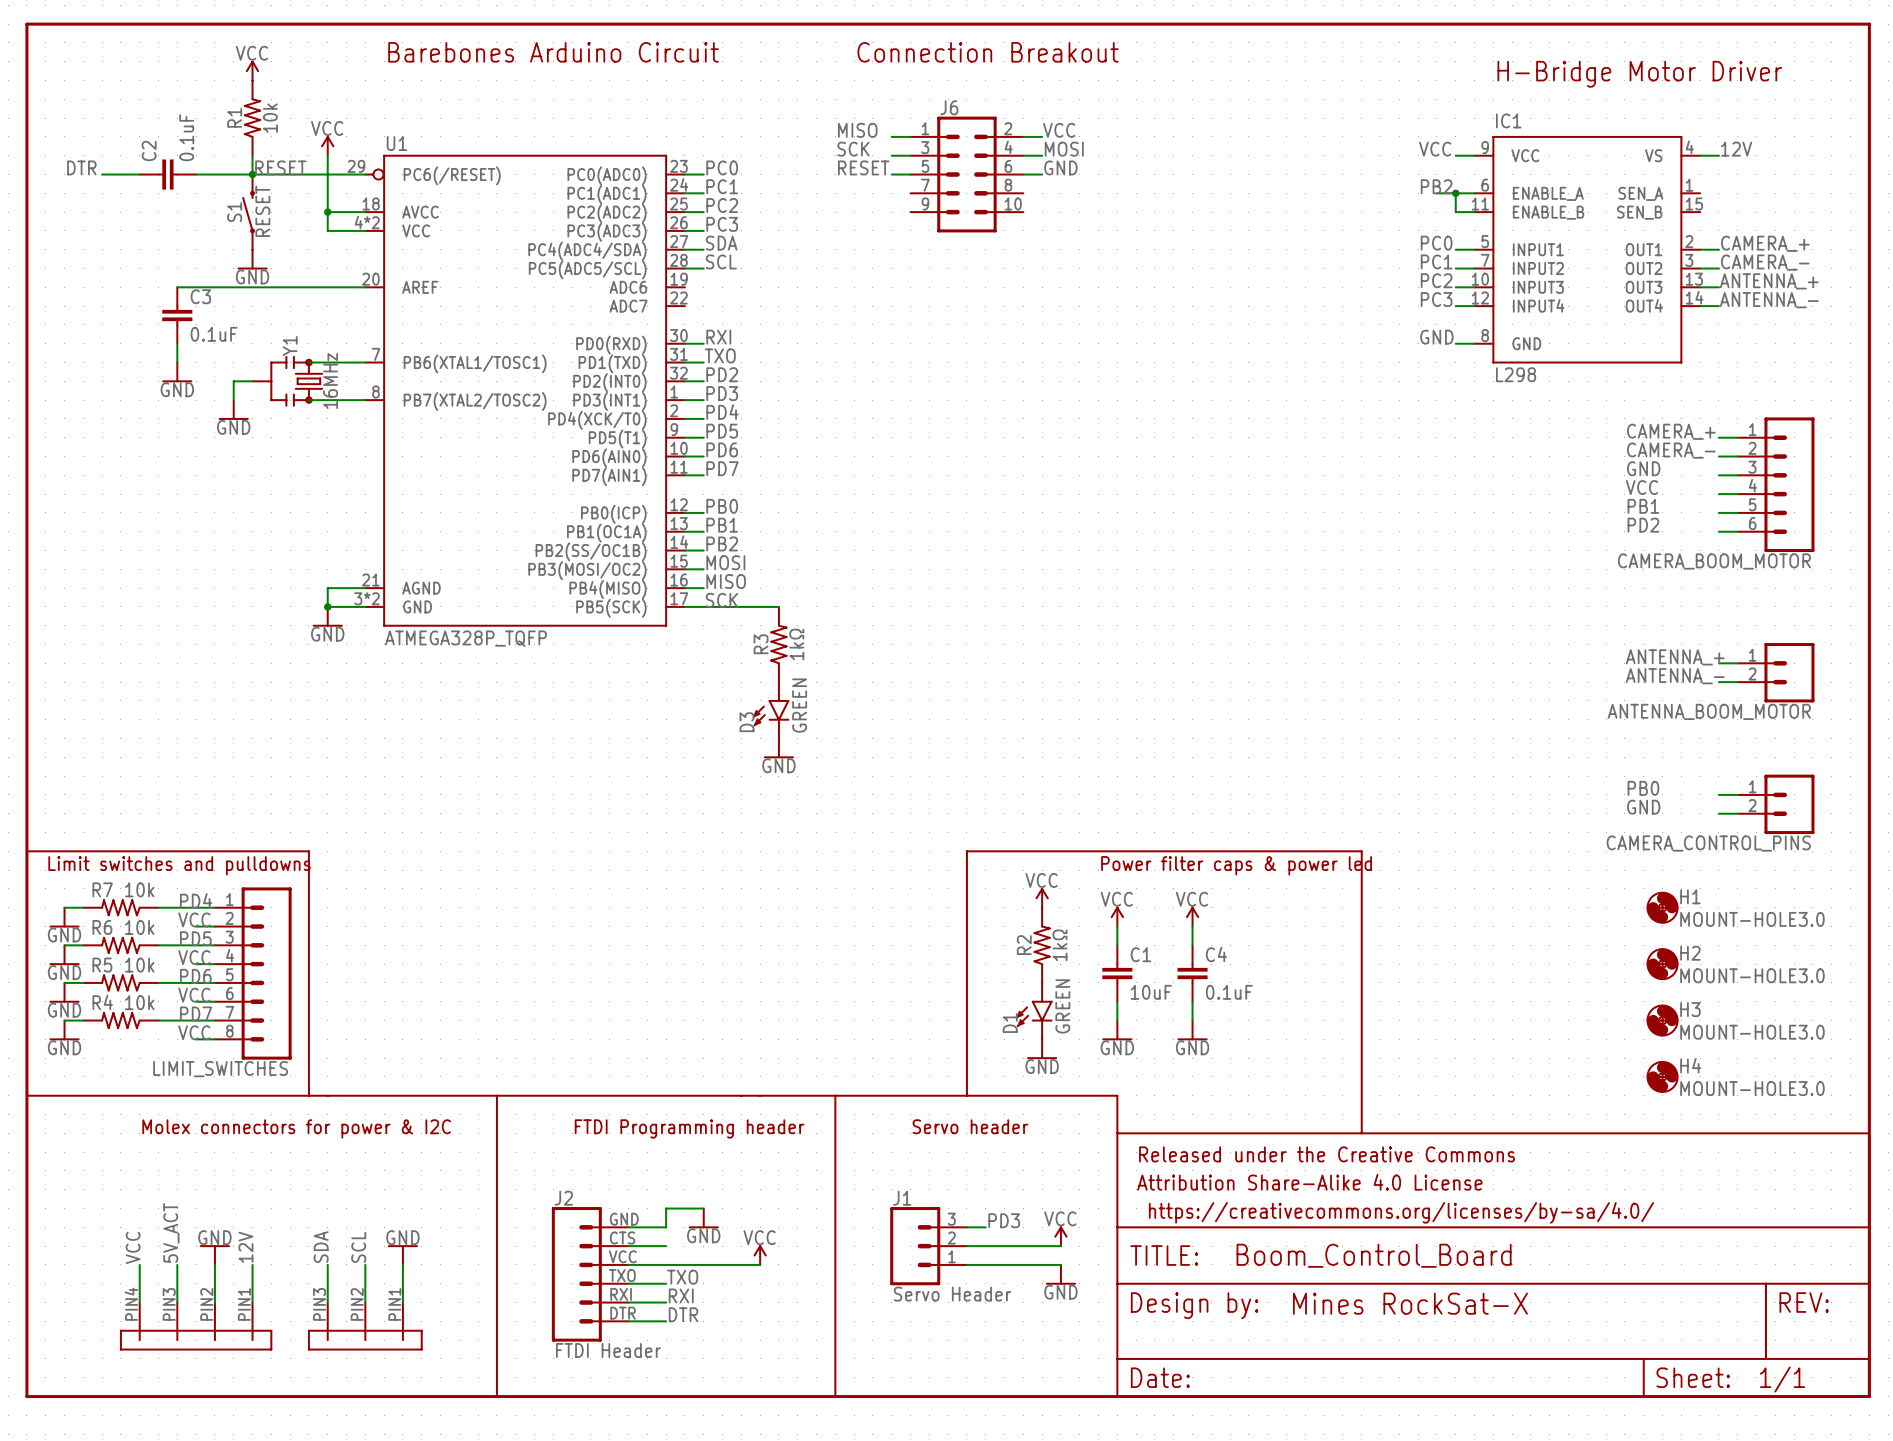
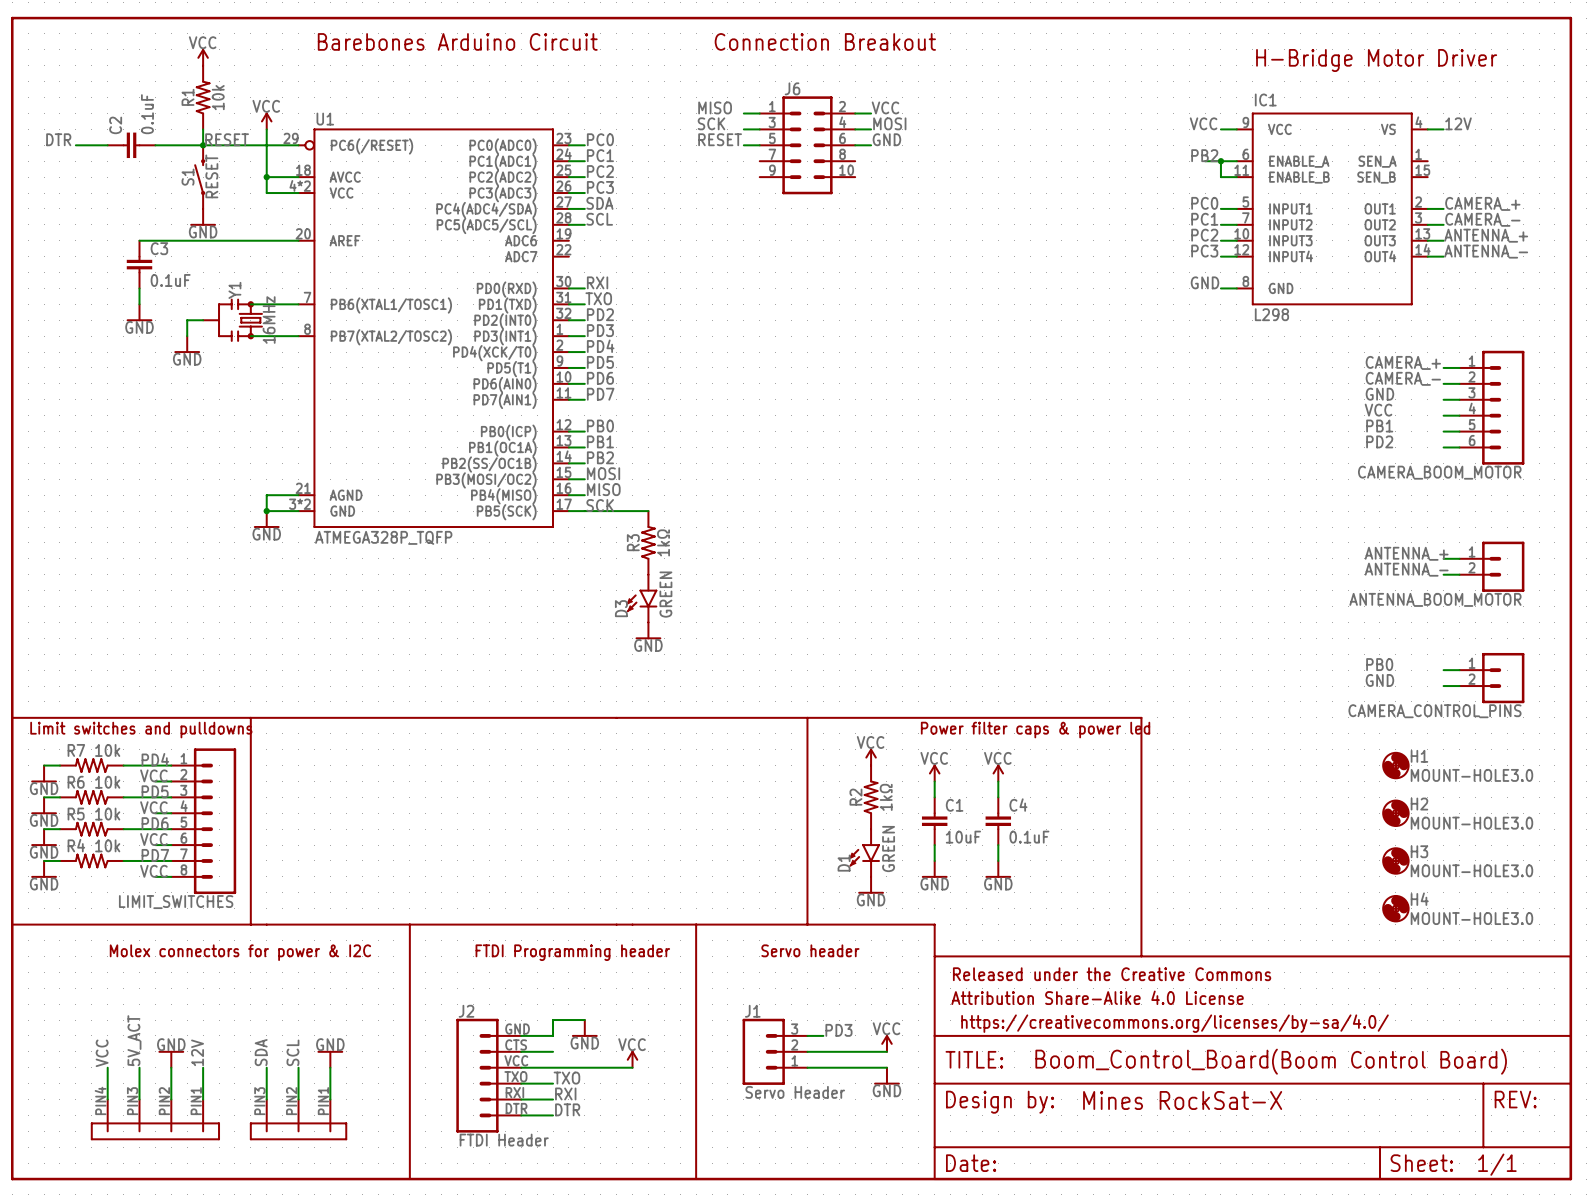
line: none -> (250, 717) (807, 717)
text: none -> (Boom Control Board) (1389, 1061)

